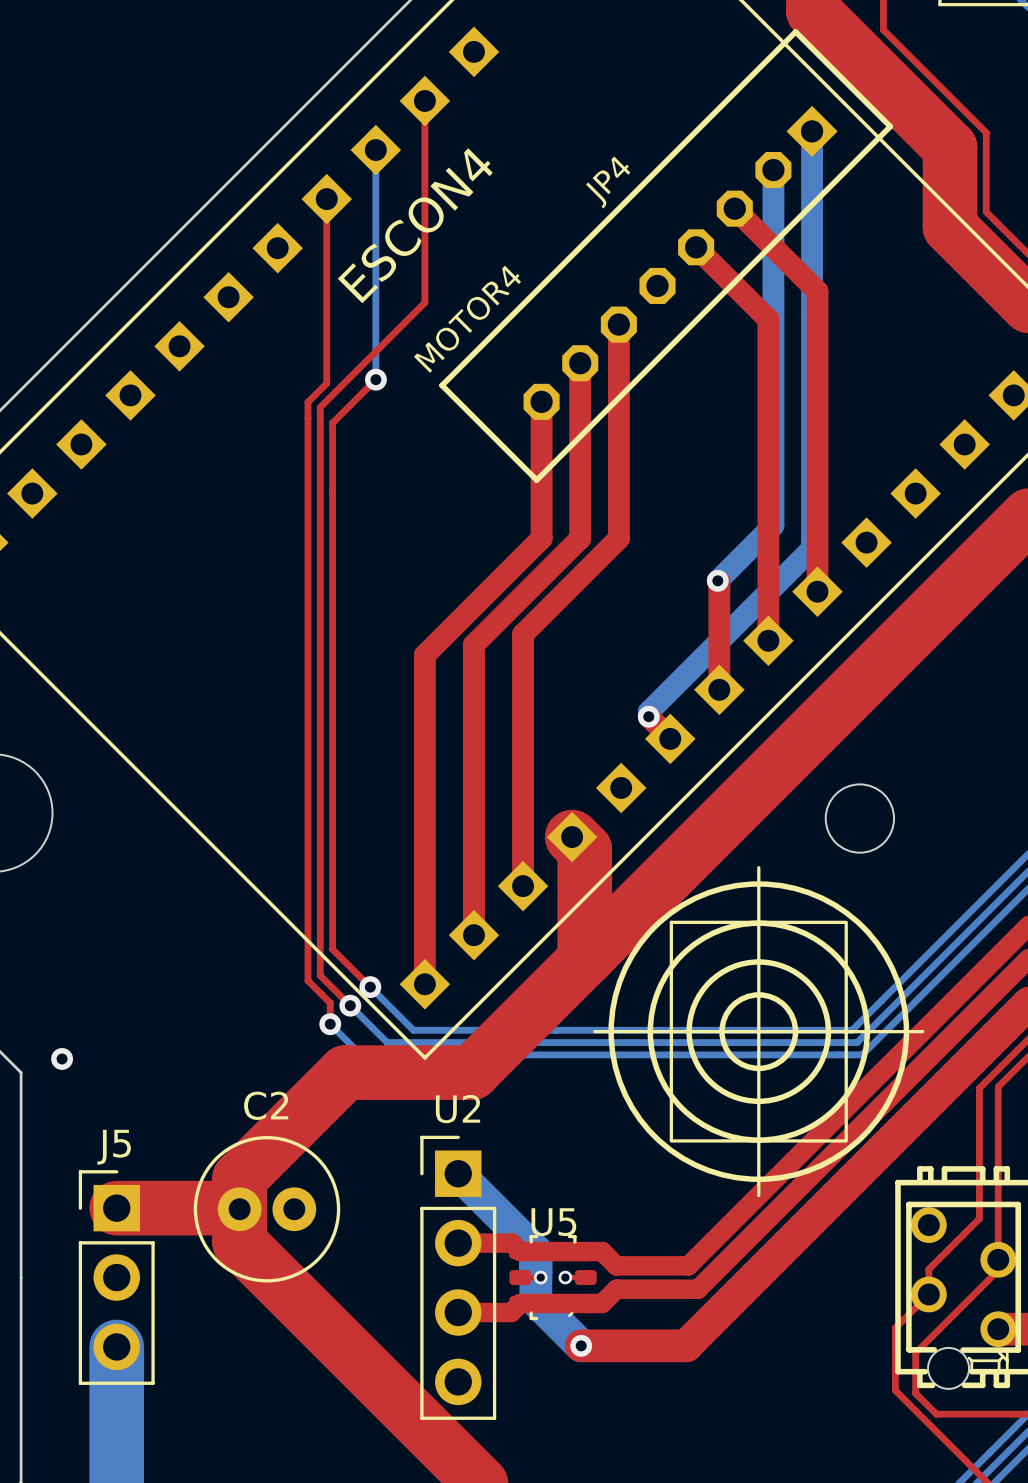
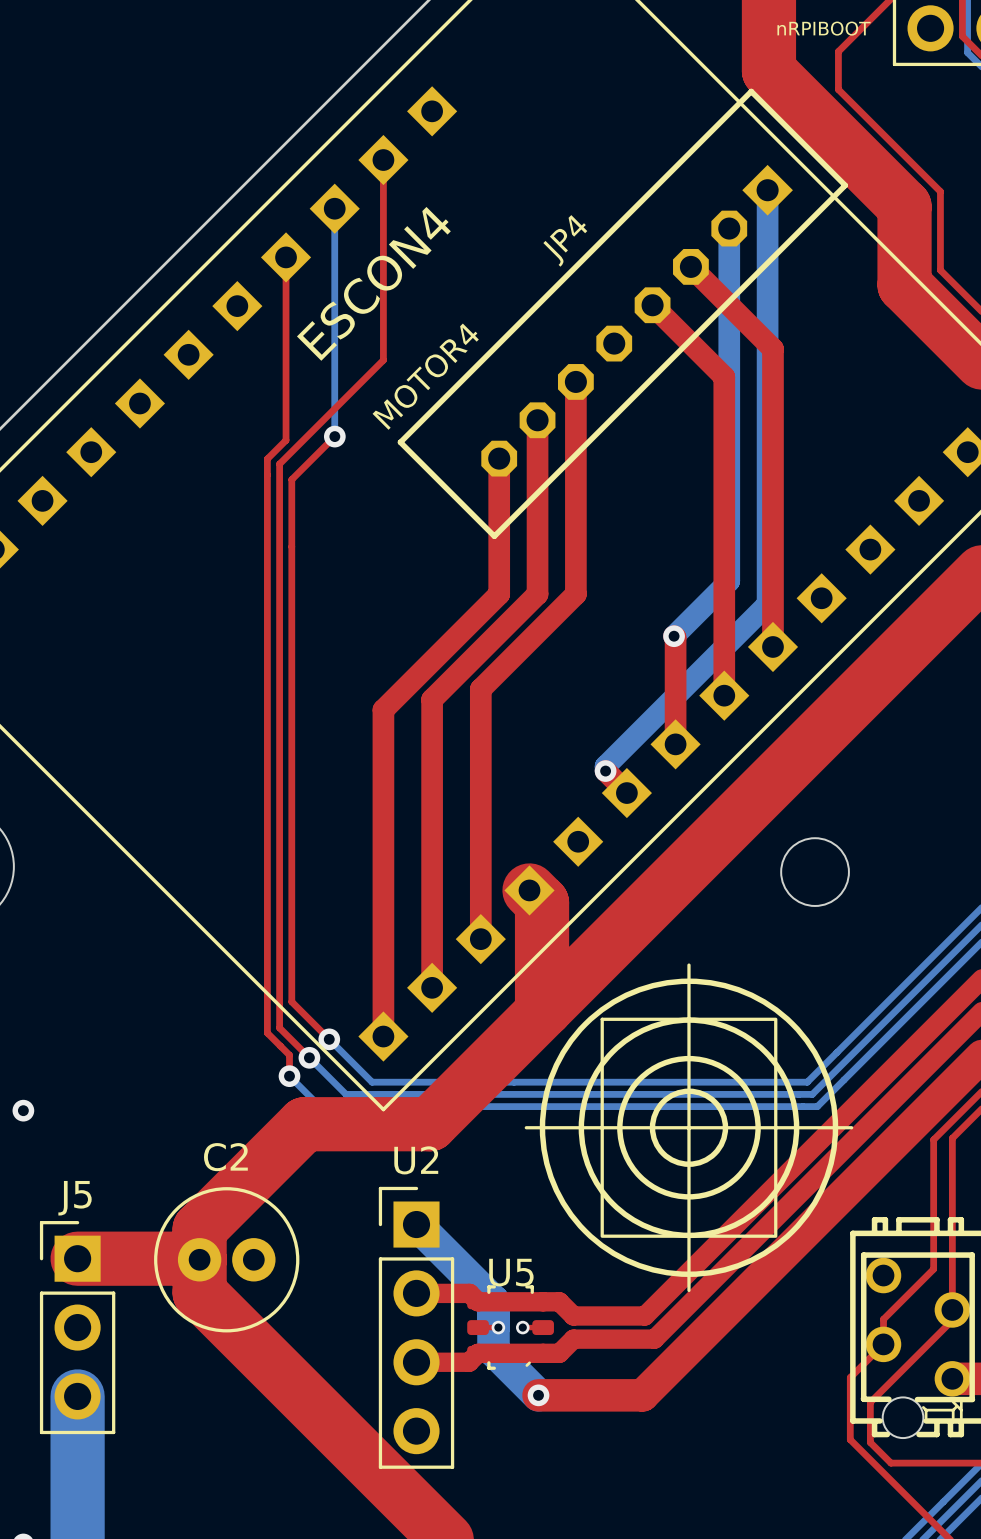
drawing position: (758, 1031) -> (688, 1127)

